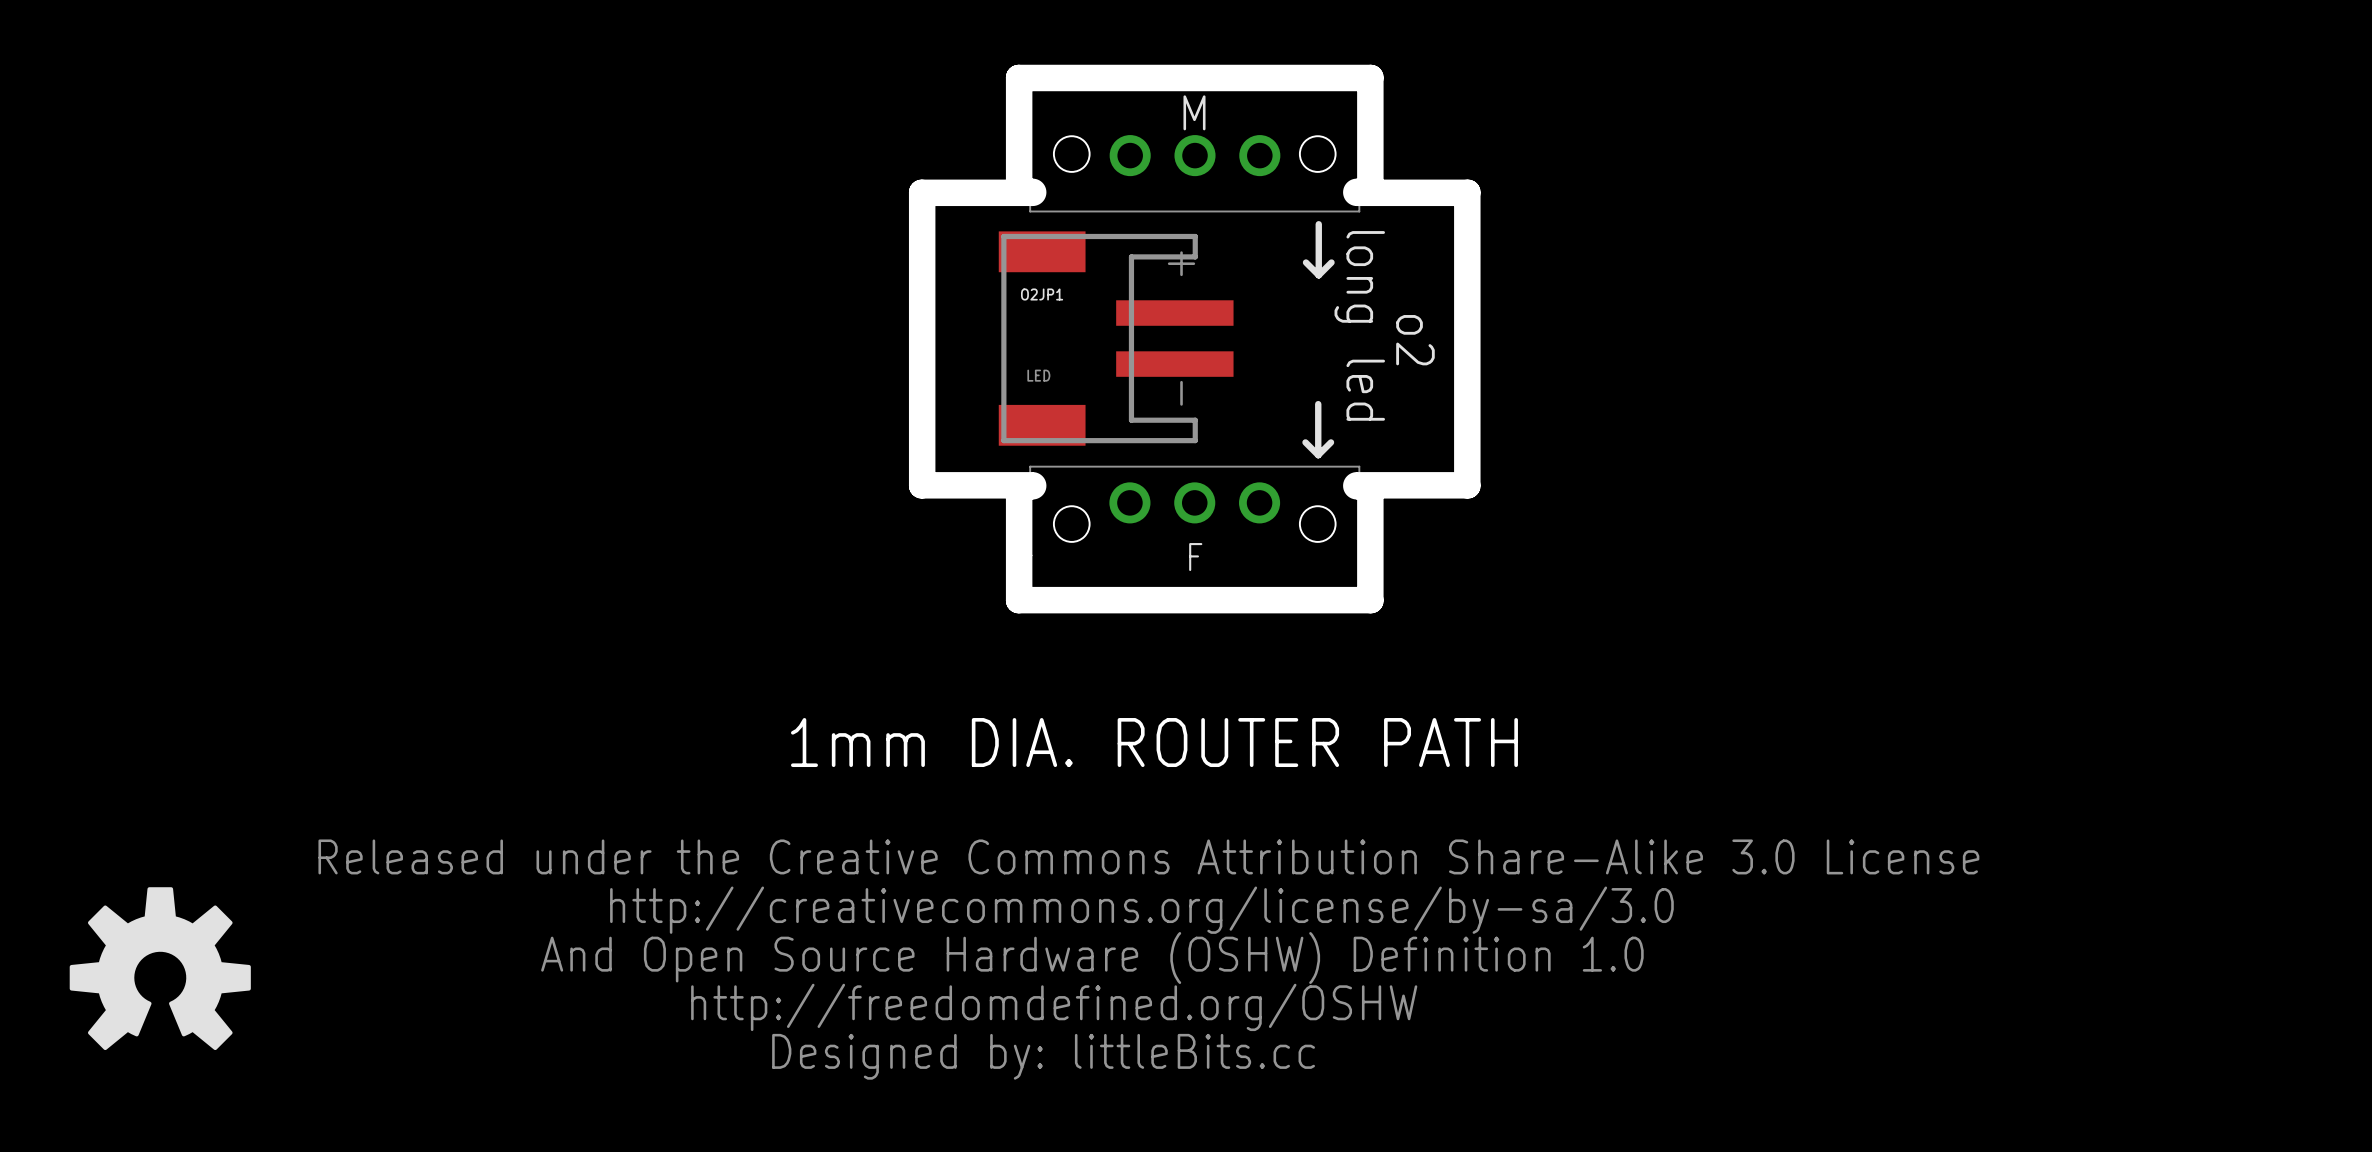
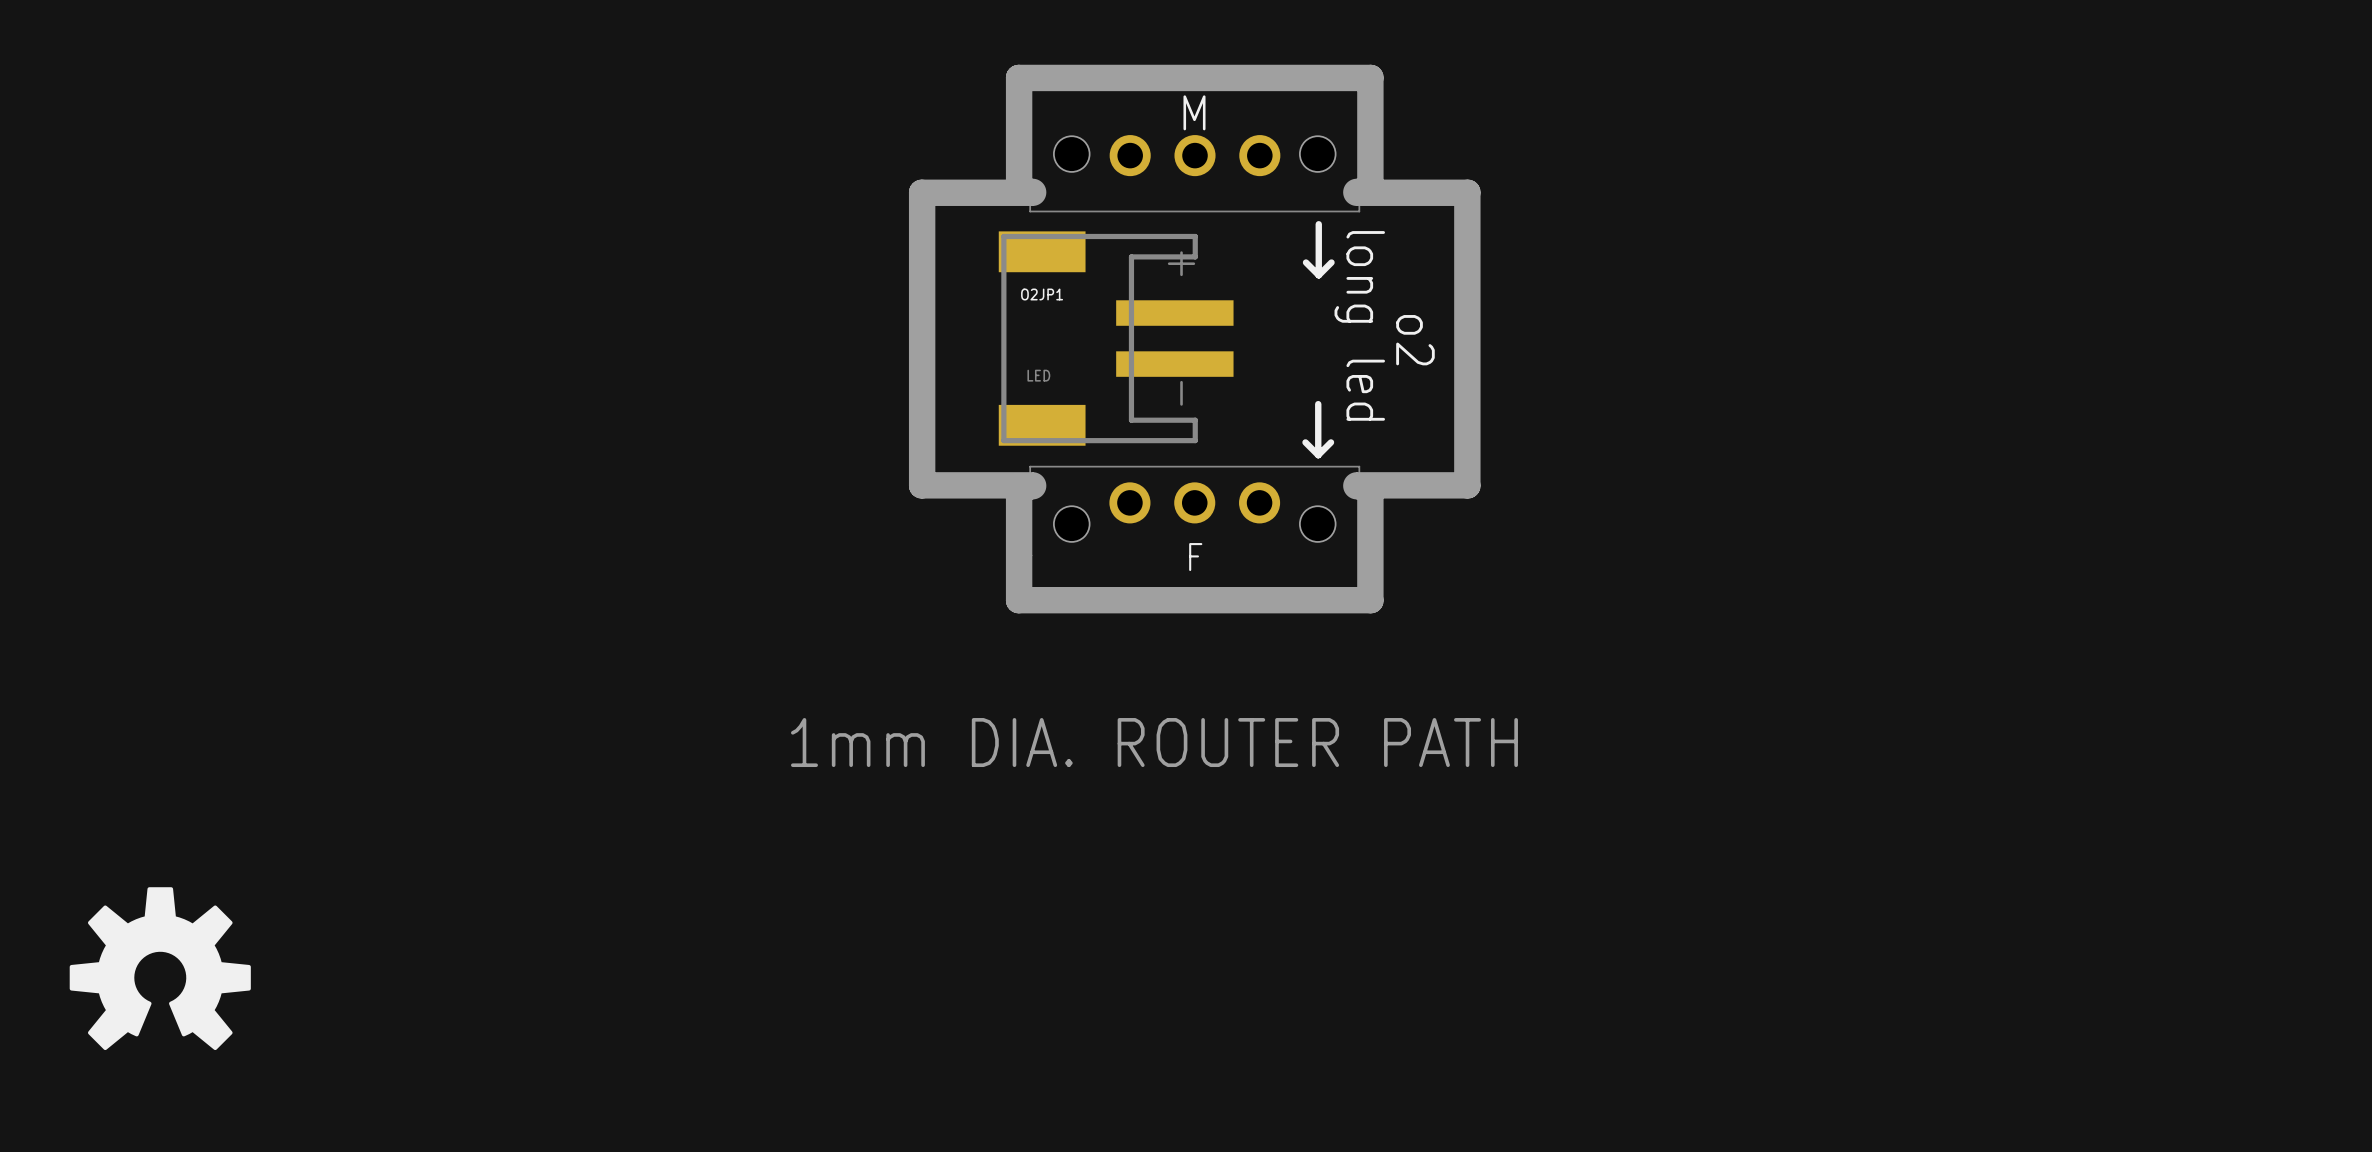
drawing: [318, 839, 1980, 1080] -> none

